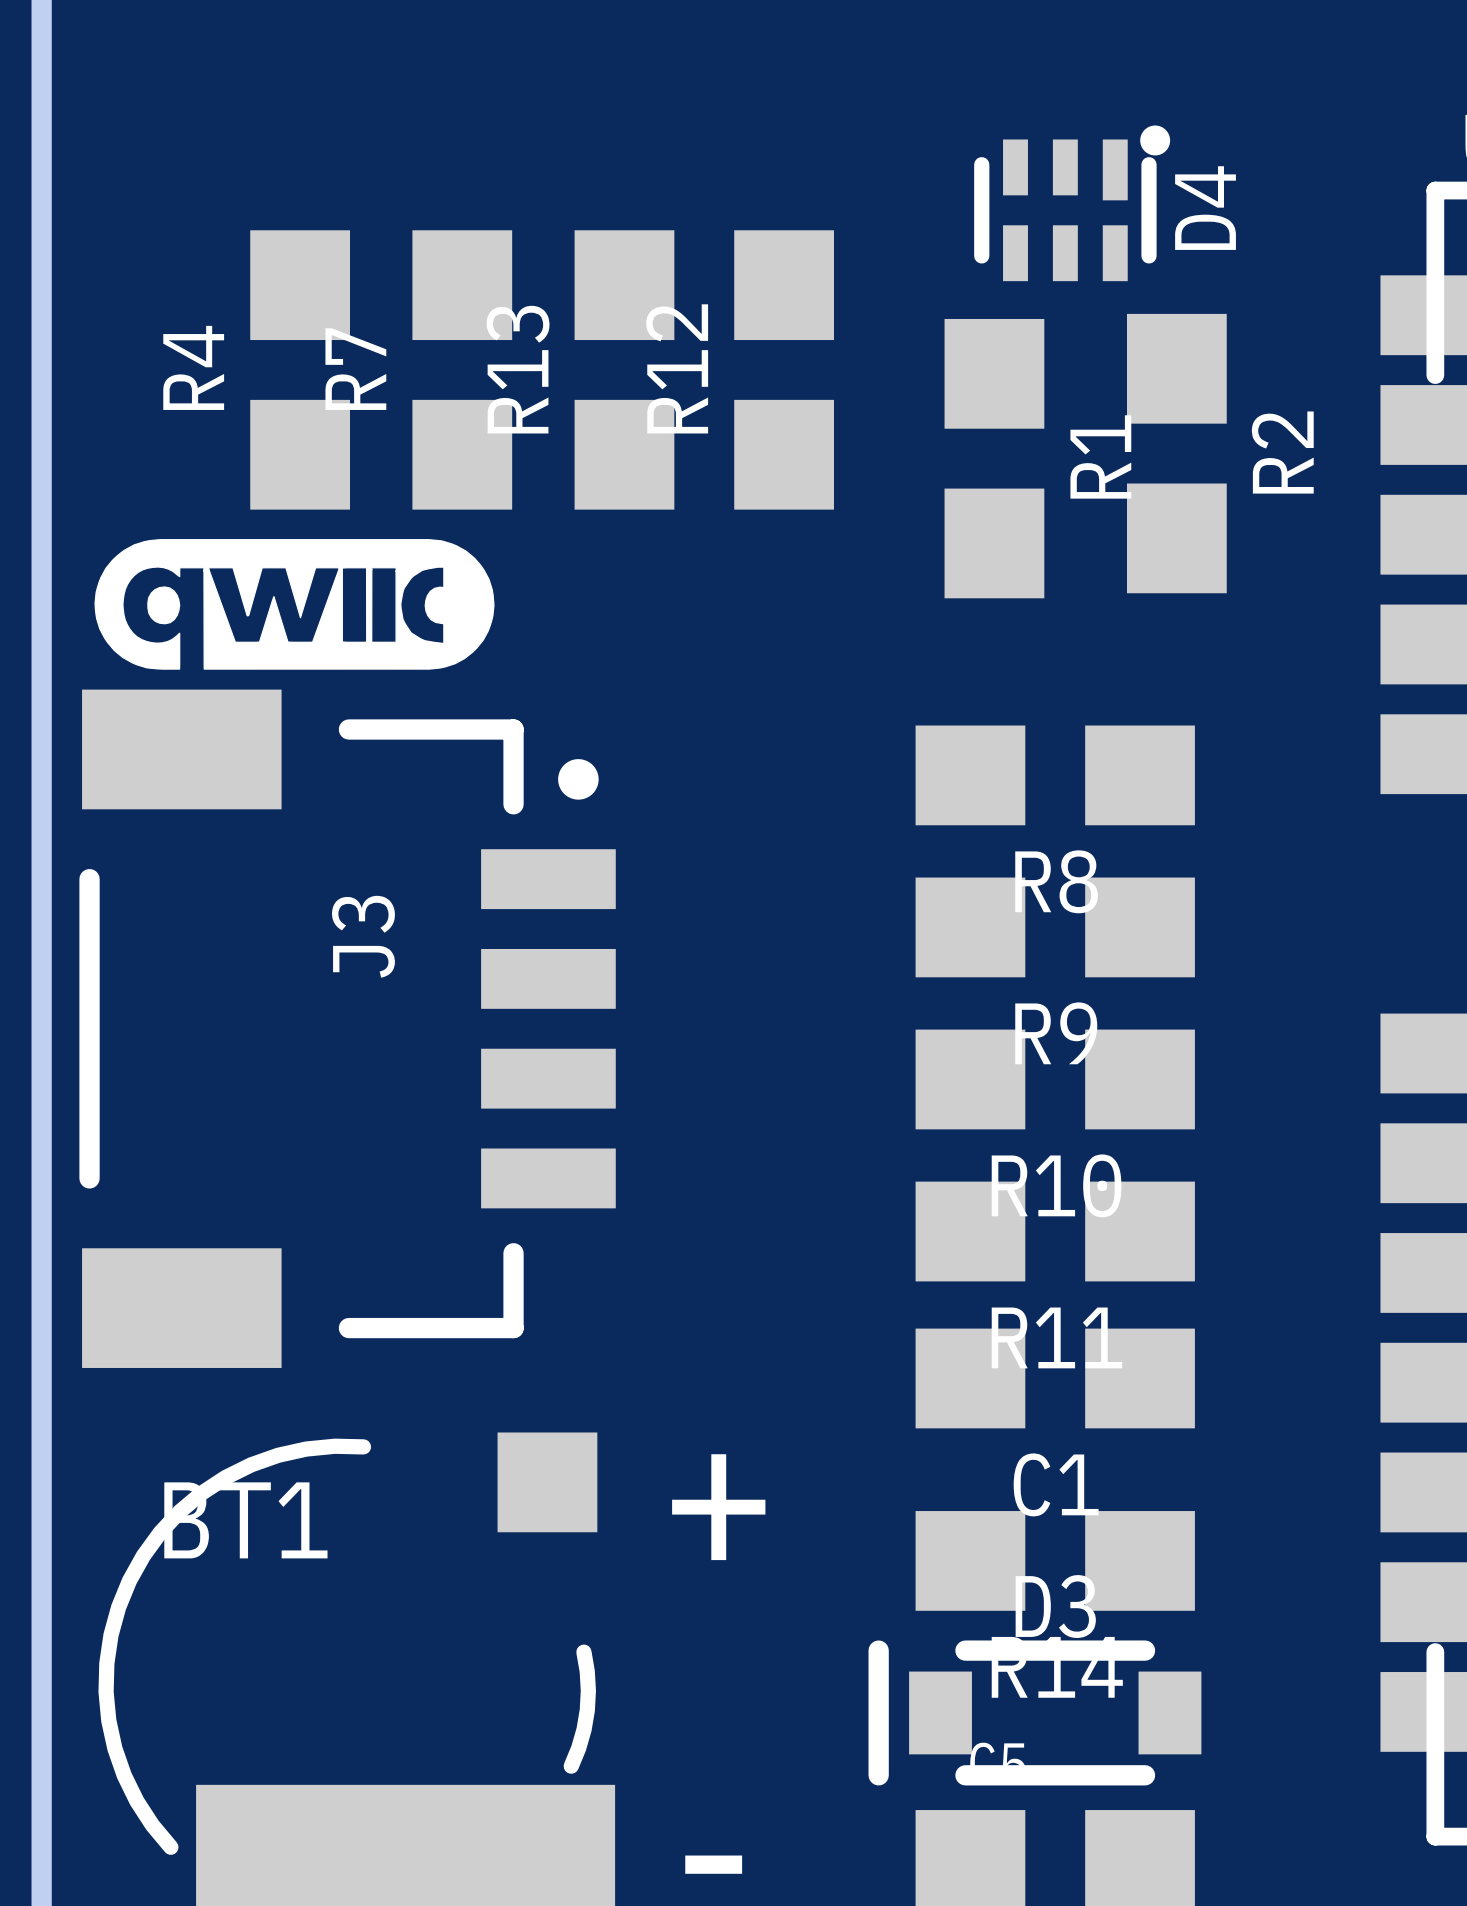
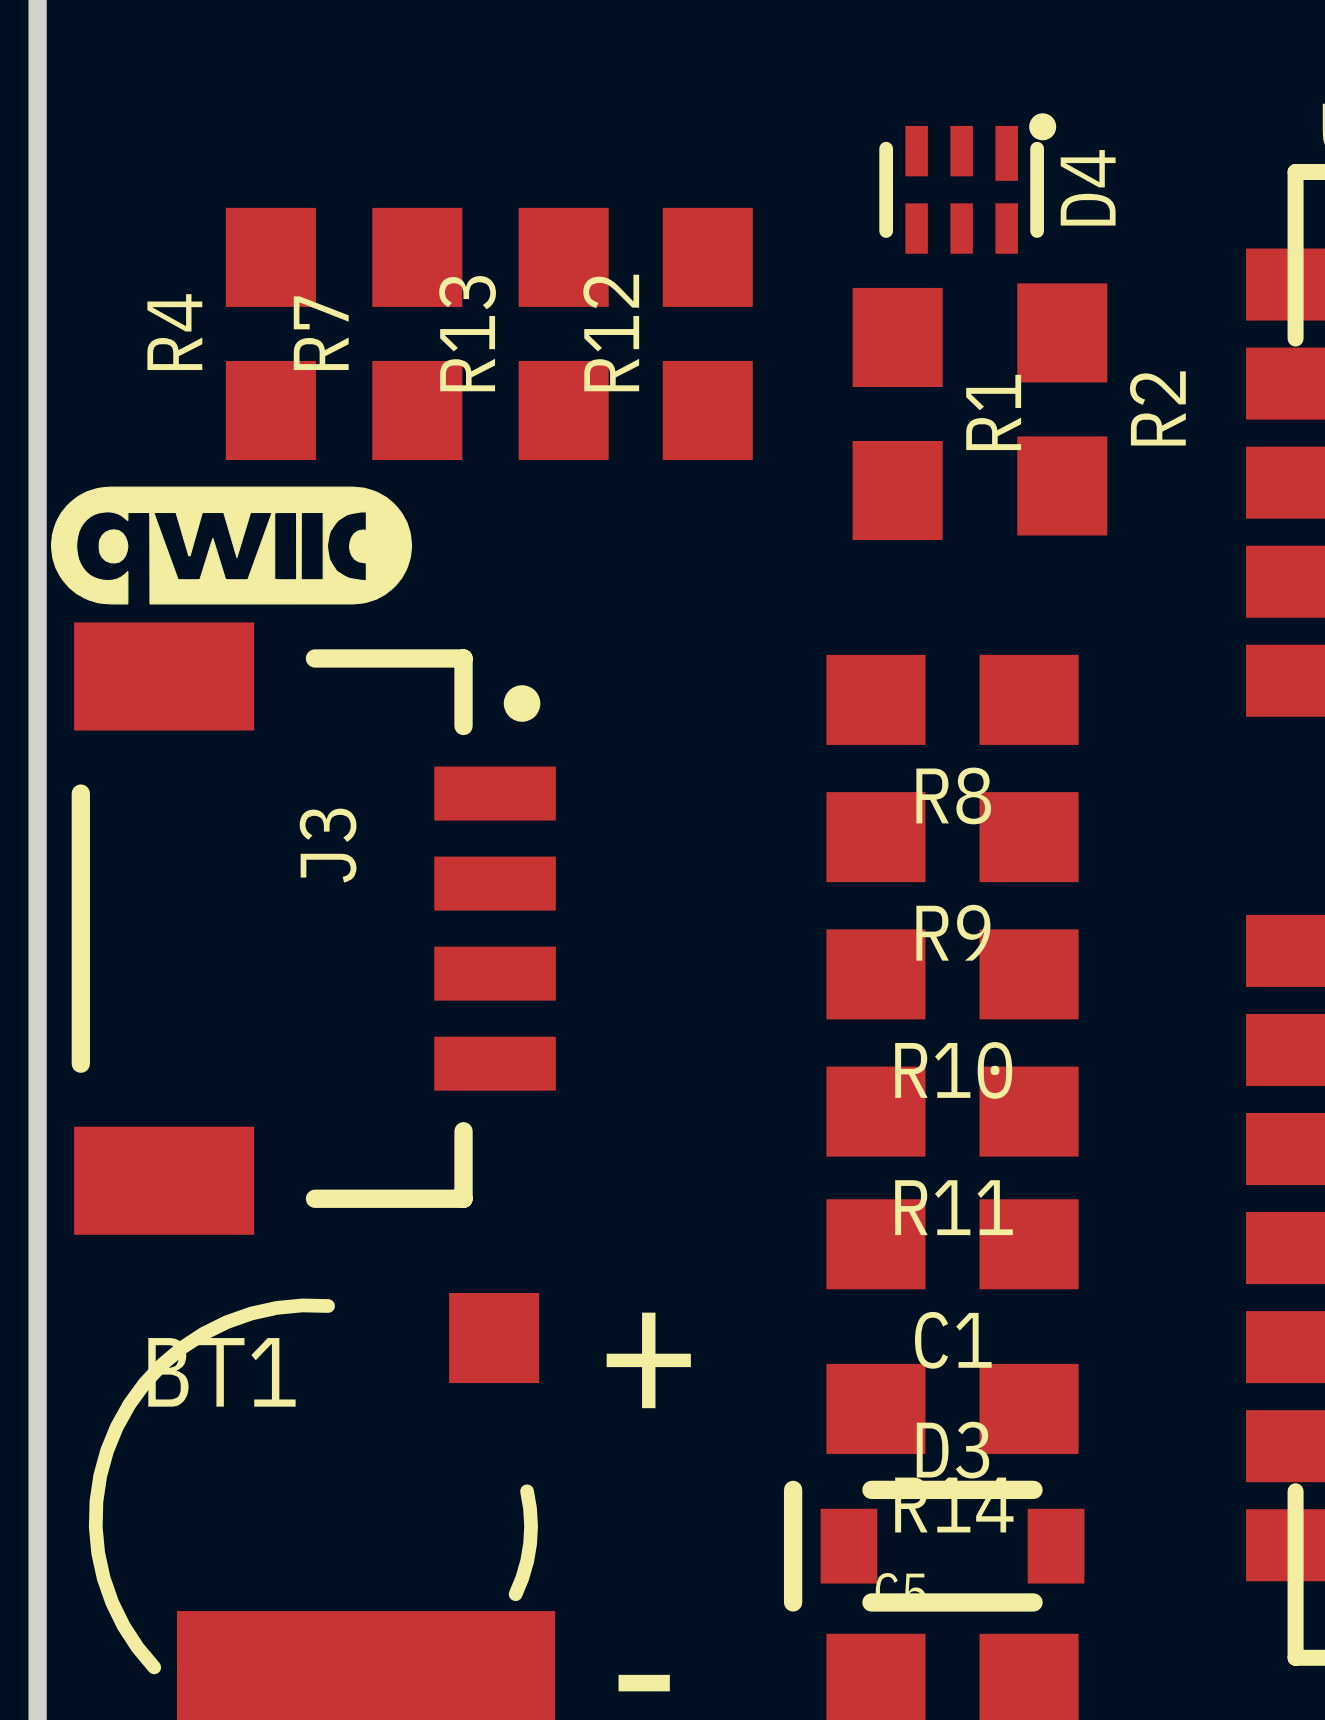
drawing position: (294, 604) -> (231, 545)

